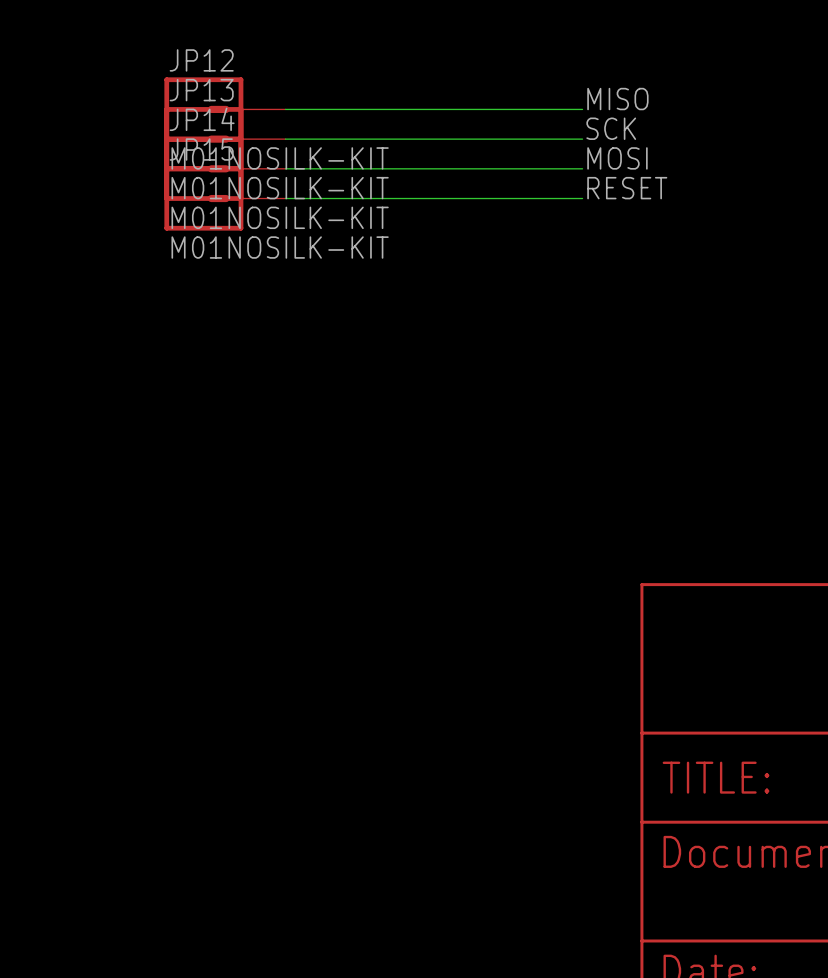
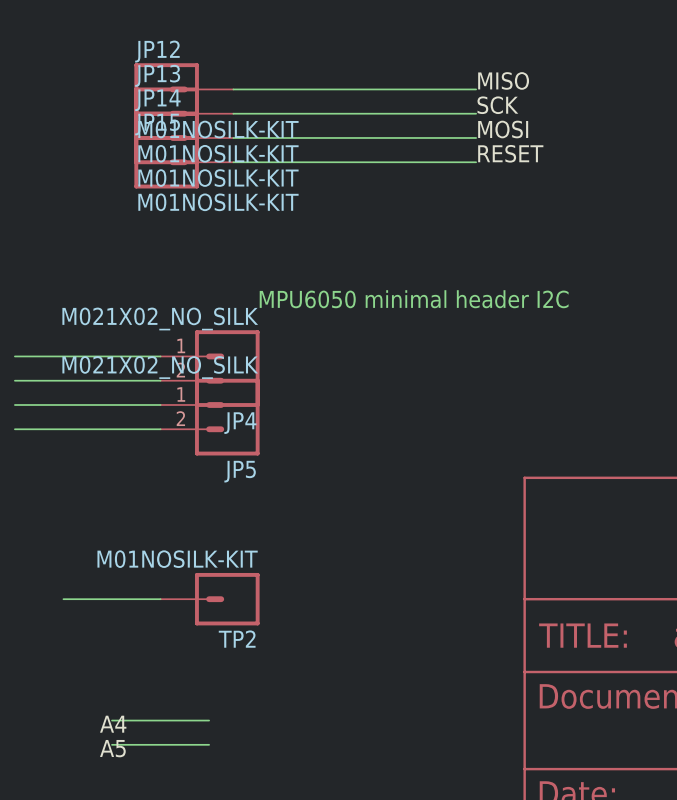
text: none -> MPU6050 minimal header I2C (414, 299)
wire: none -> (14, 356) (160, 356)
JP4: none -> M021X02_NO_SILK (210, 368)
wire: none -> (14, 380) (160, 380)
wire: none -> (14, 404) (160, 404)
JP5: none -> M021X02_NO_SILK (210, 417)
wire: none -> (14, 429) (160, 429)
wire: none -> (63, 599) (160, 599)
TP2: none -> M01NOSILK-KIT (210, 599)
wire: none -> (112, 720) (209, 720)
label: none -> A4 (113, 724)
wire: none -> (112, 744) (209, 744)
label: none -> A5 (112, 748)

